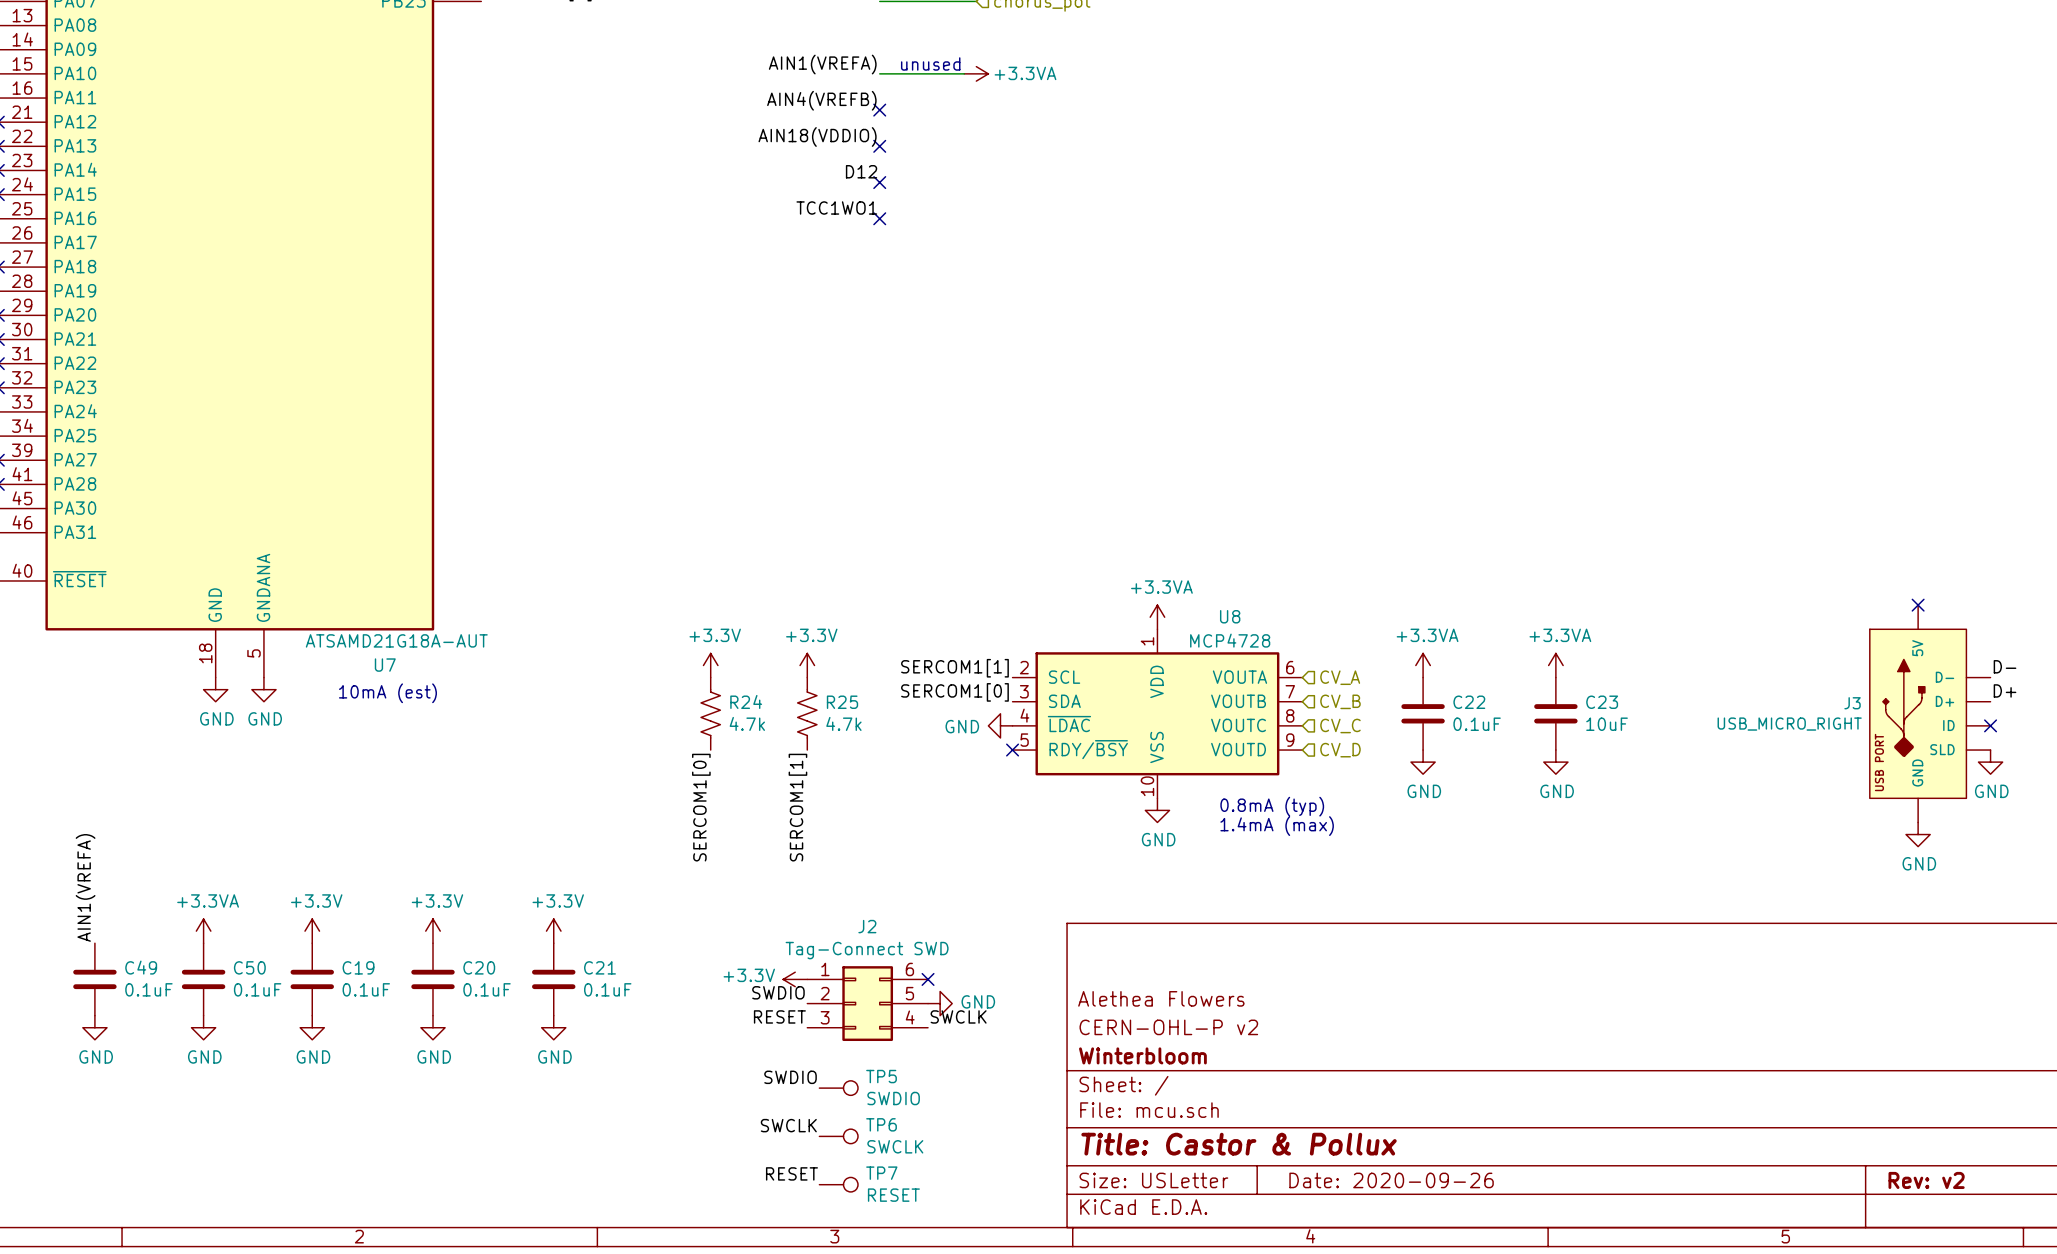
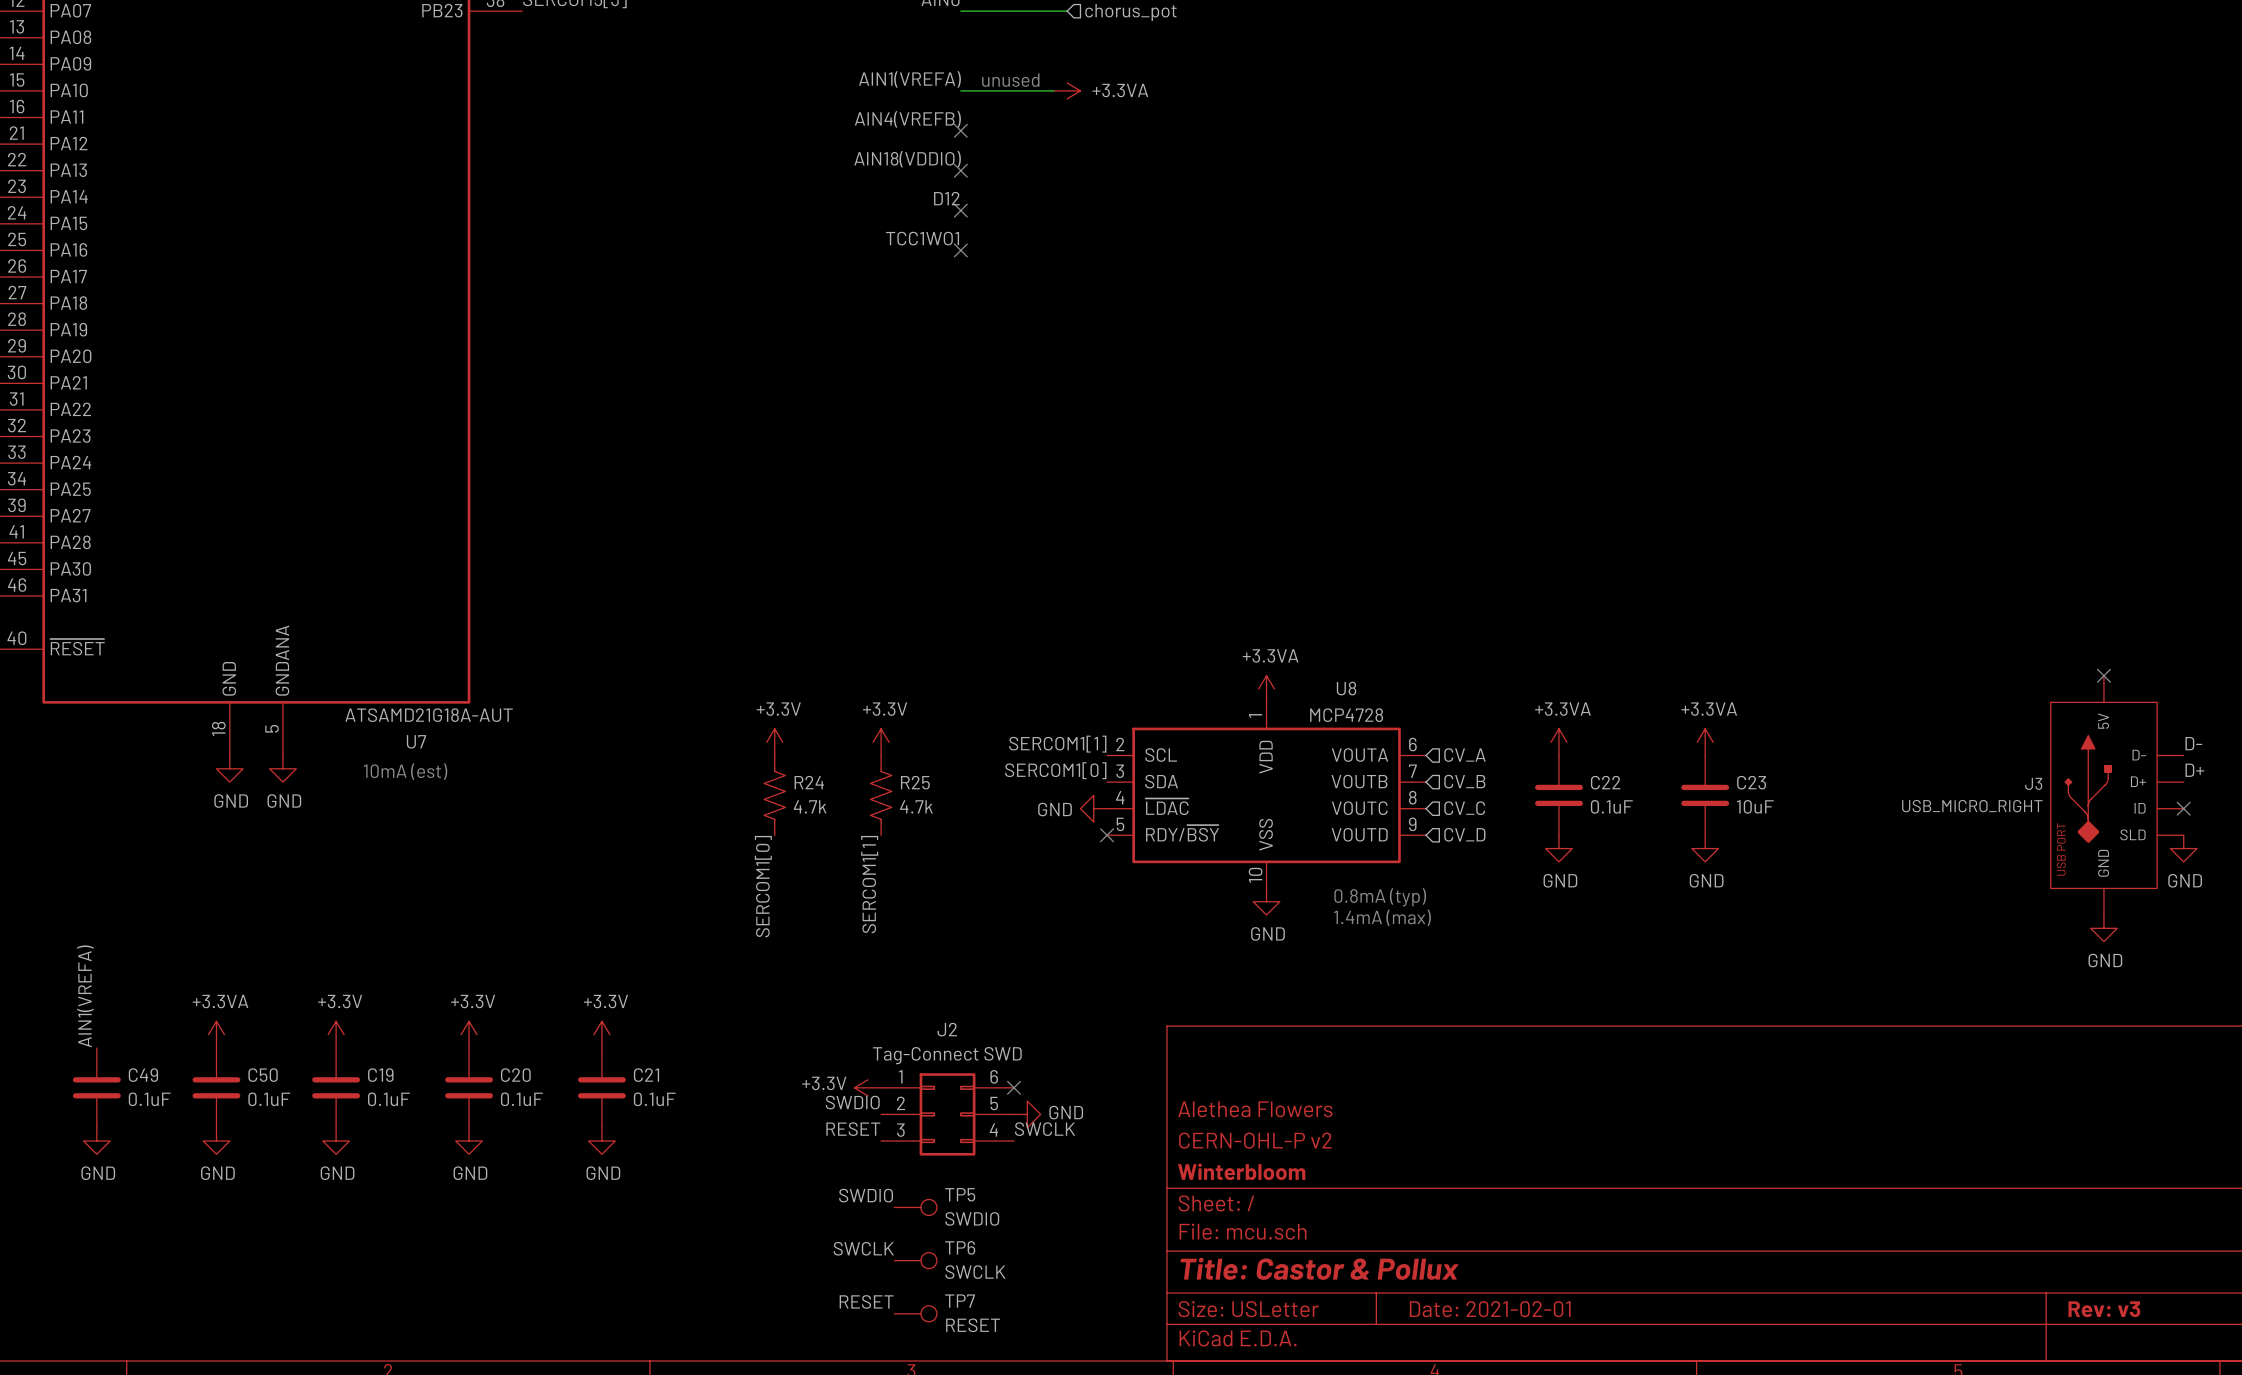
title block: Date: 2020-09-26 (1391, 1180) -> Date: 2021-02-01 (1490, 1309)
title block: Rev: v2 (1926, 1180) -> Rev: v3 (2104, 1309)

